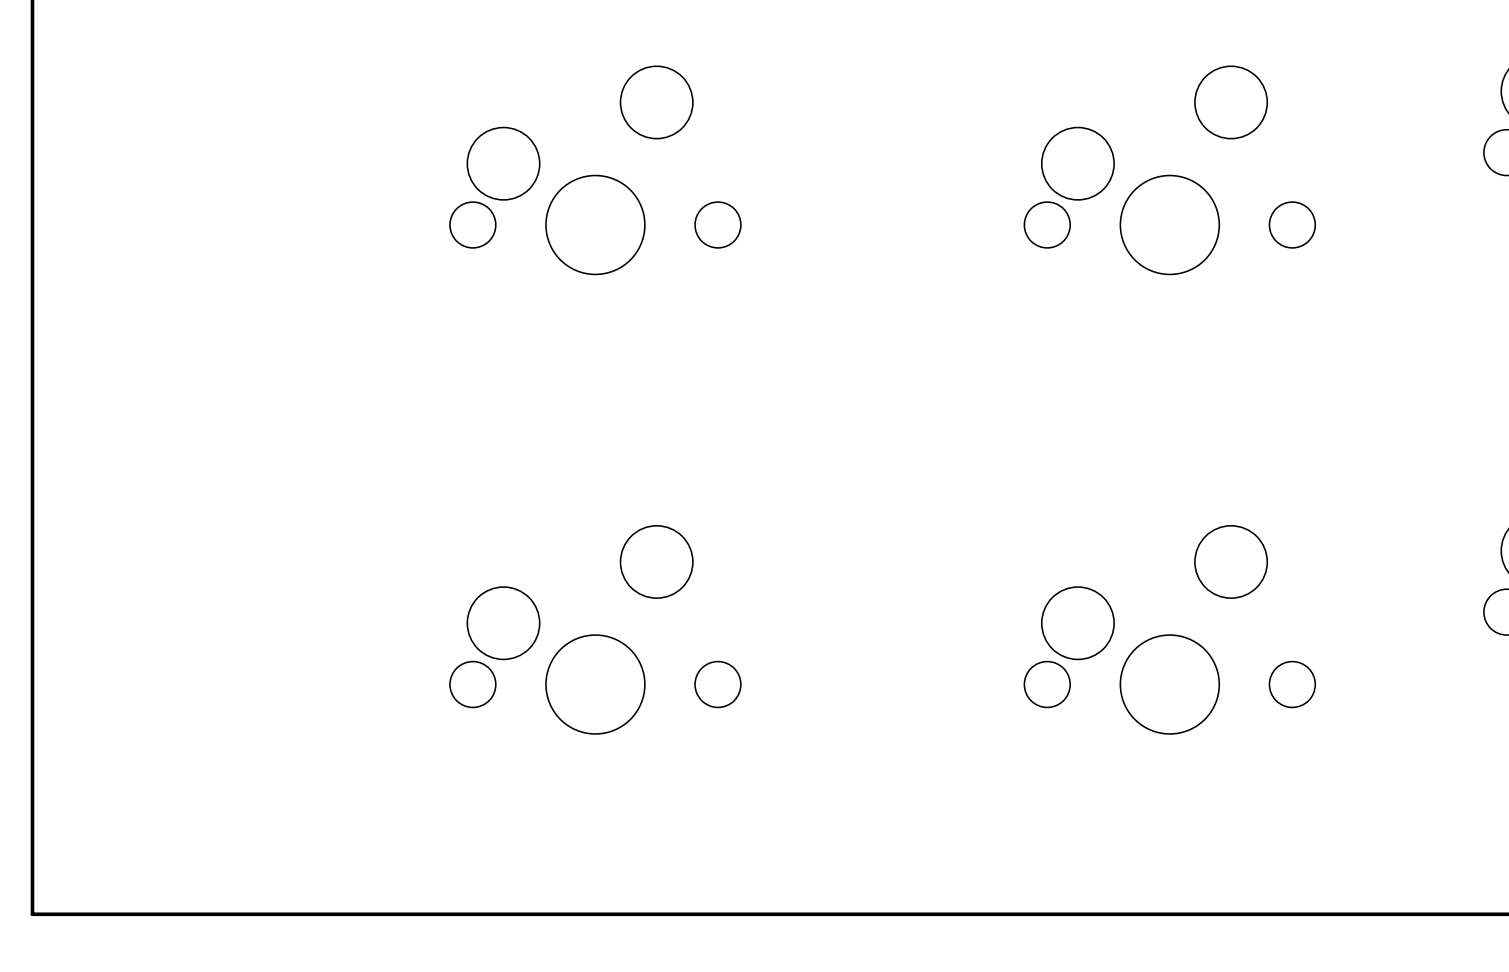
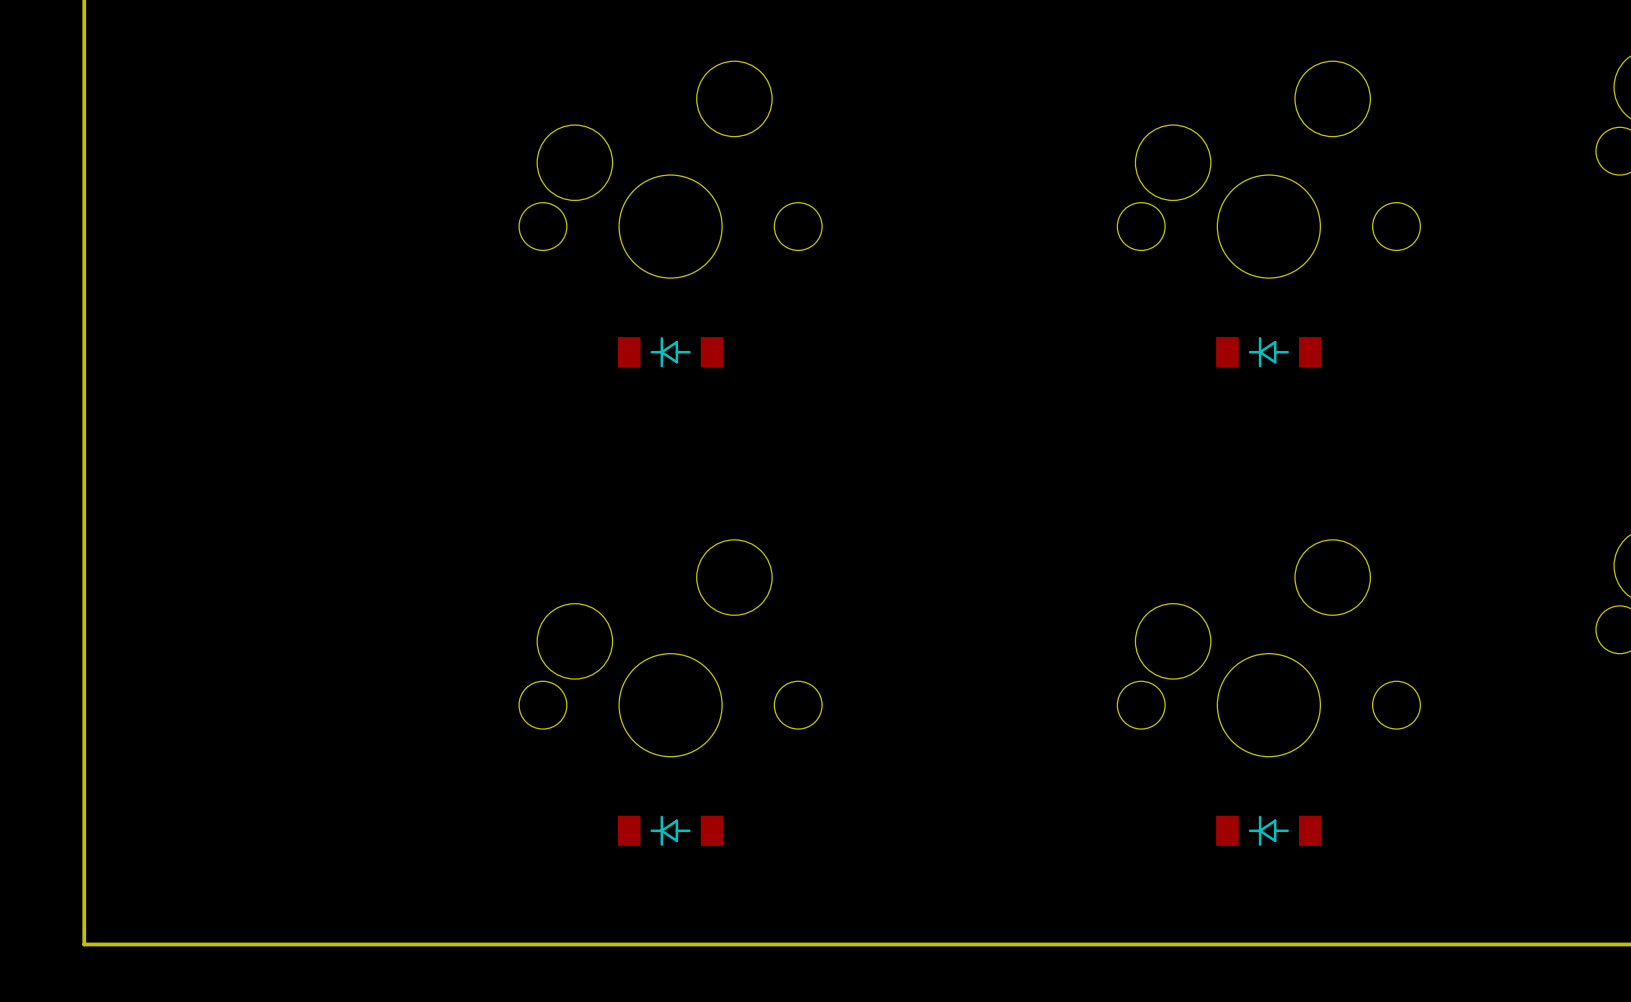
part: none -> (670, 352)
part: none -> (1268, 352)
part: none -> (670, 830)
part: none -> (1268, 830)

